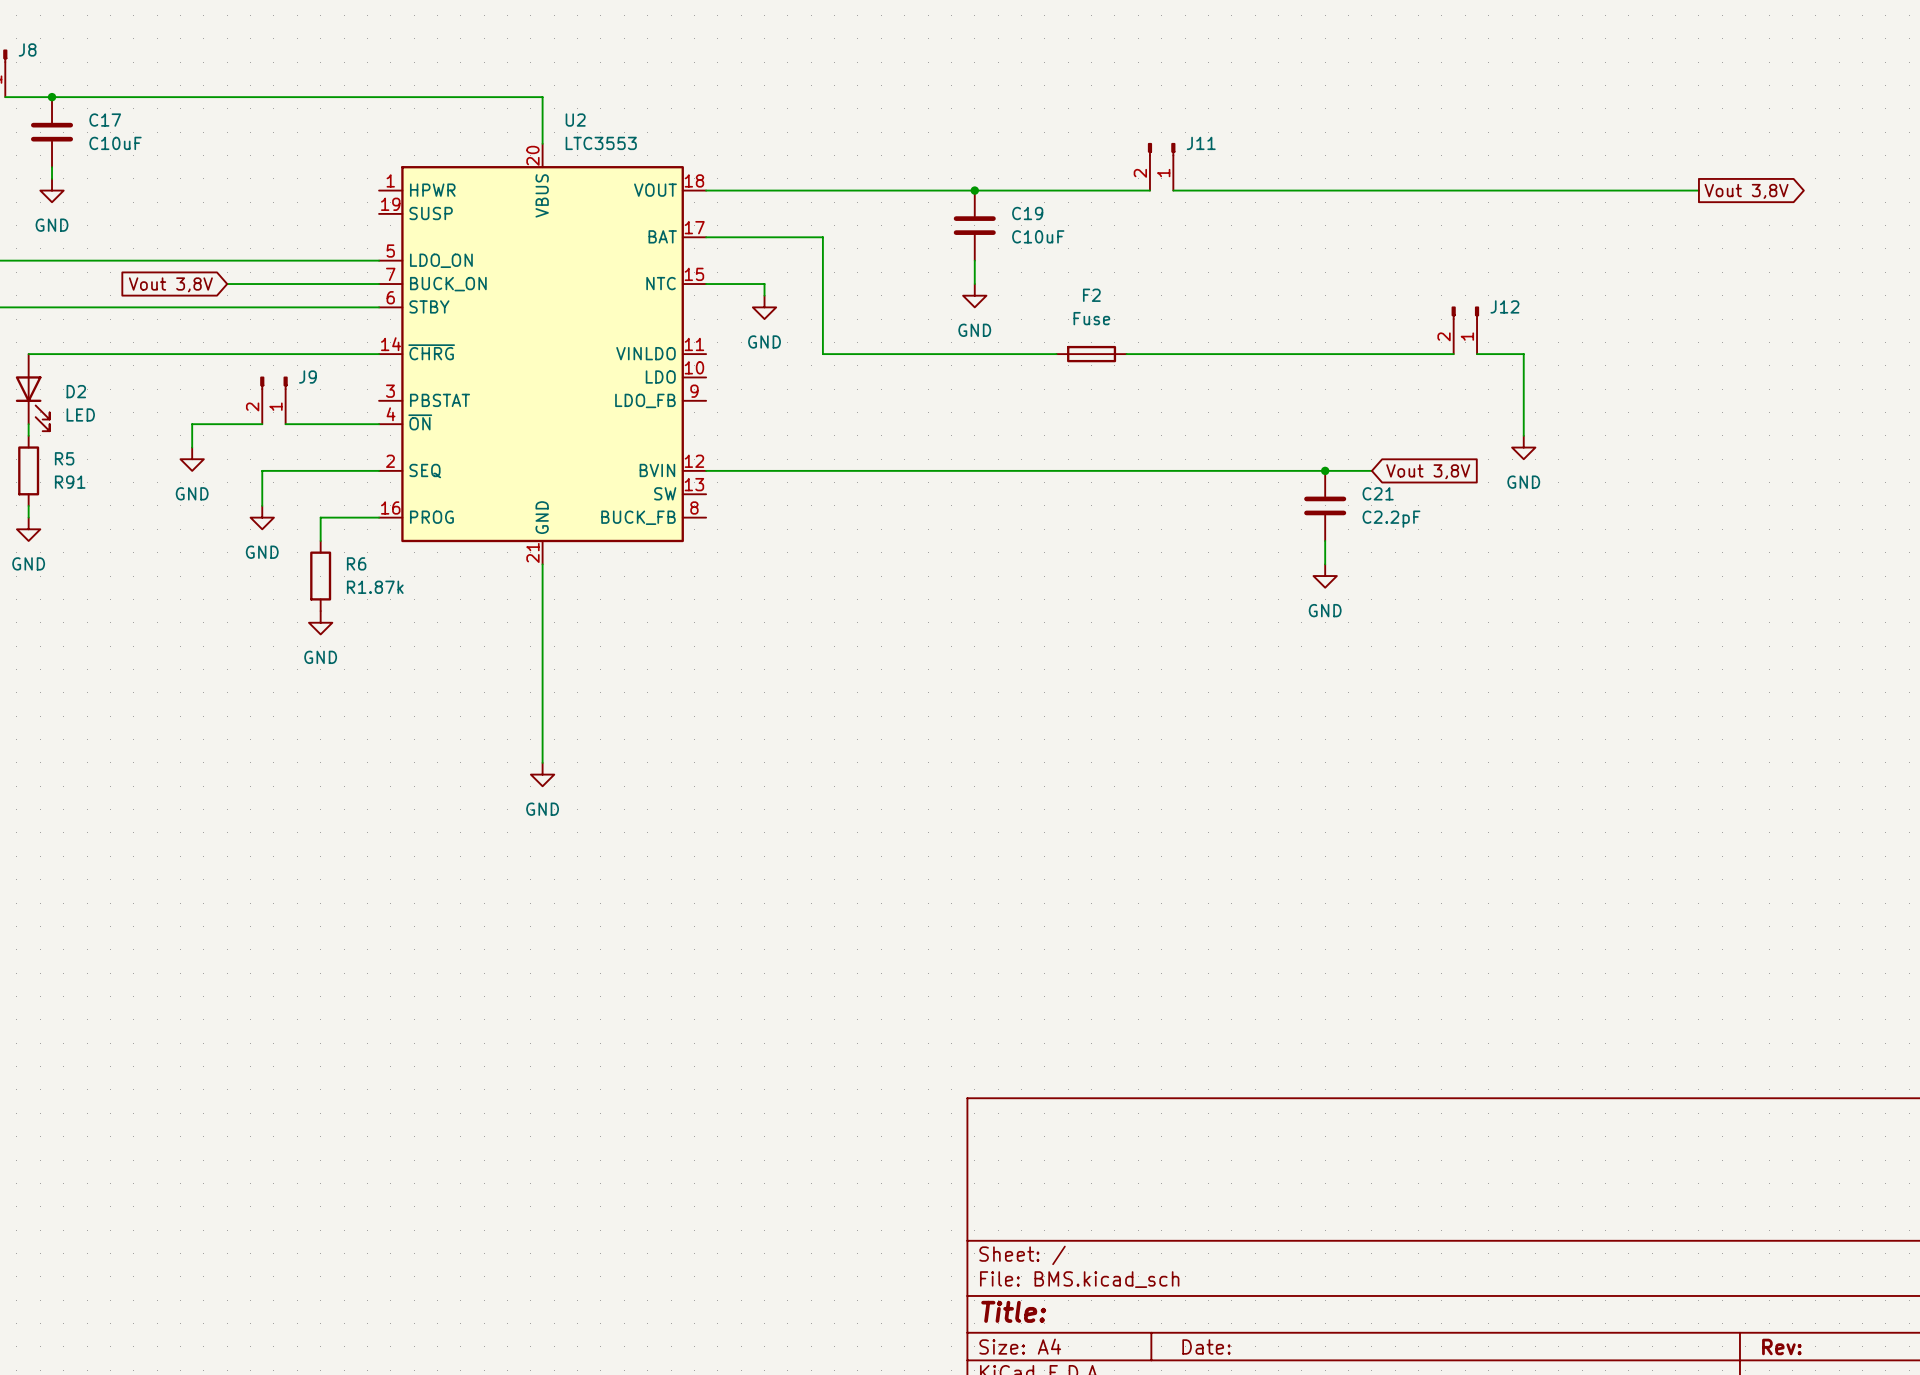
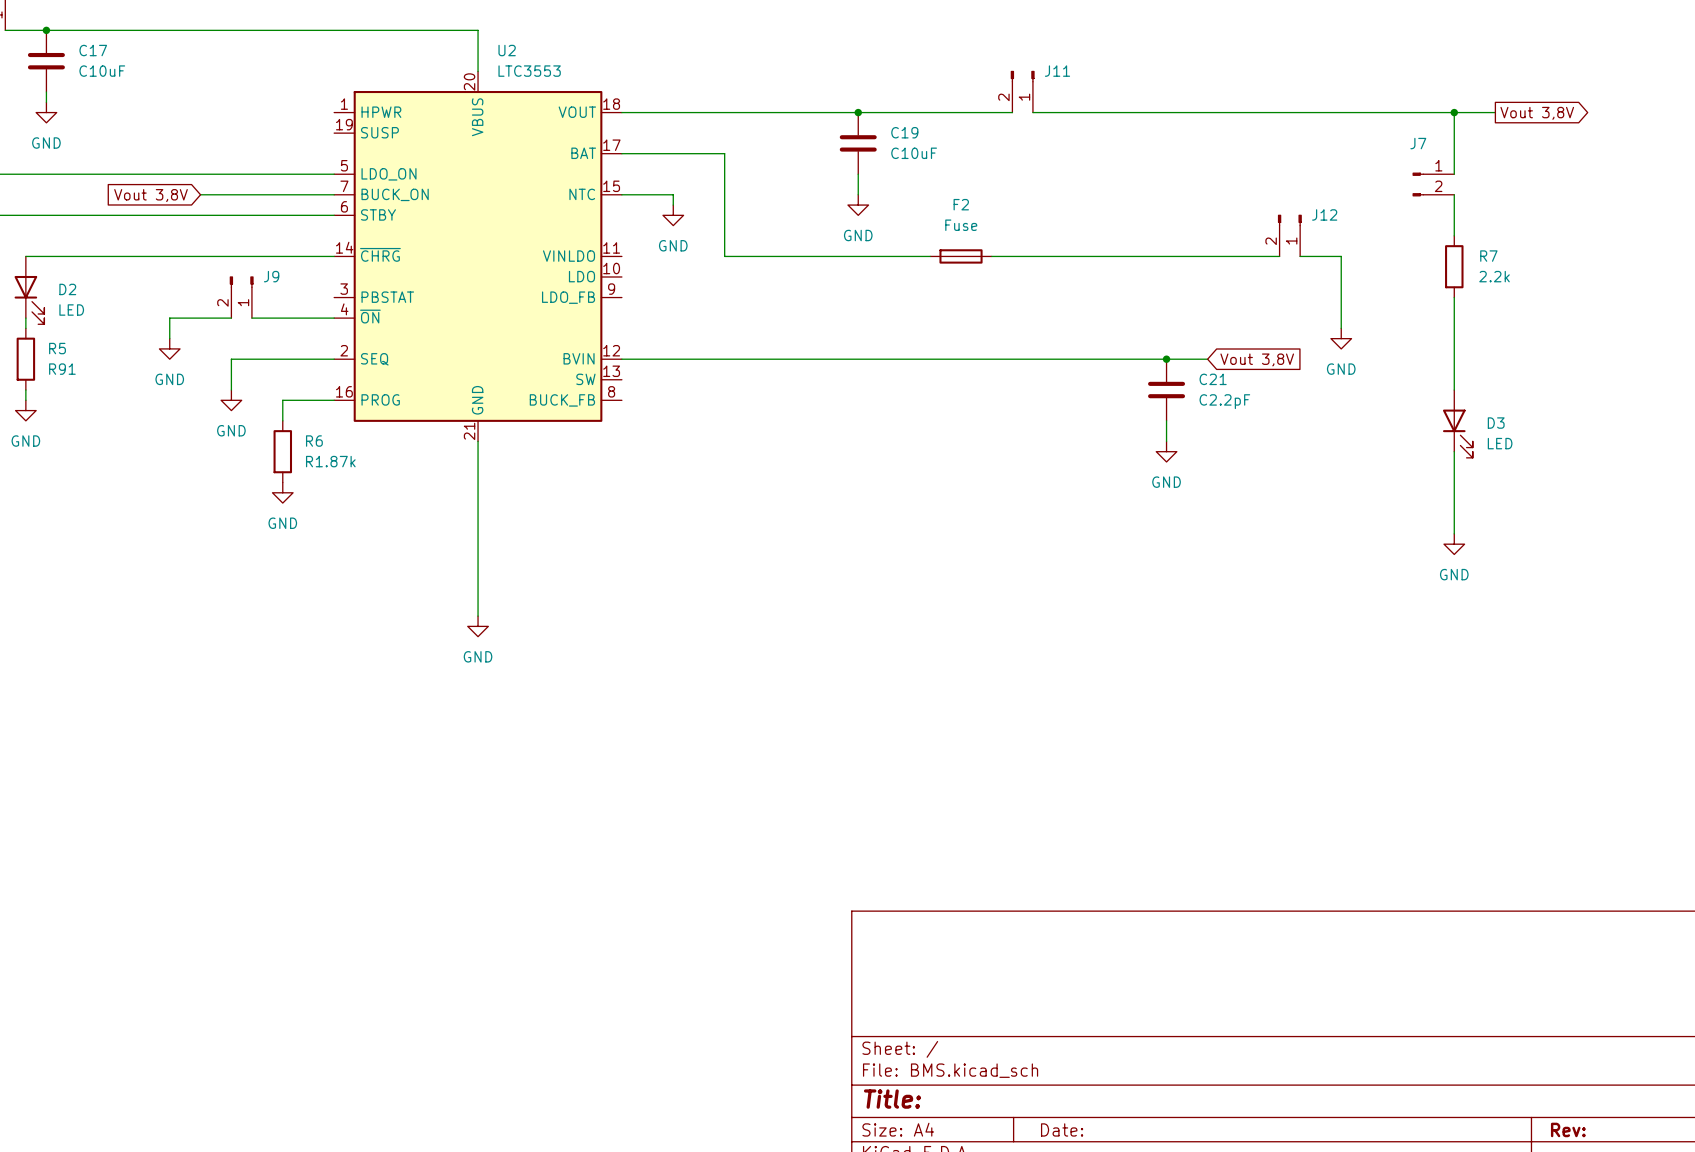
wire: none -> (1454, 112) (1454, 174)
junction: none -> (1454, 112)
J7: none -> (1433, 184)
wire: none -> (1454, 194) (1454, 235)
R7: none -> 2.2k (1454, 266)
wire: none -> (1454, 297) (1454, 390)
D3: none -> LED (1457, 423)
wire: none -> (1454, 451) (1454, 533)
power symbol: none -> GND (1454, 544)

